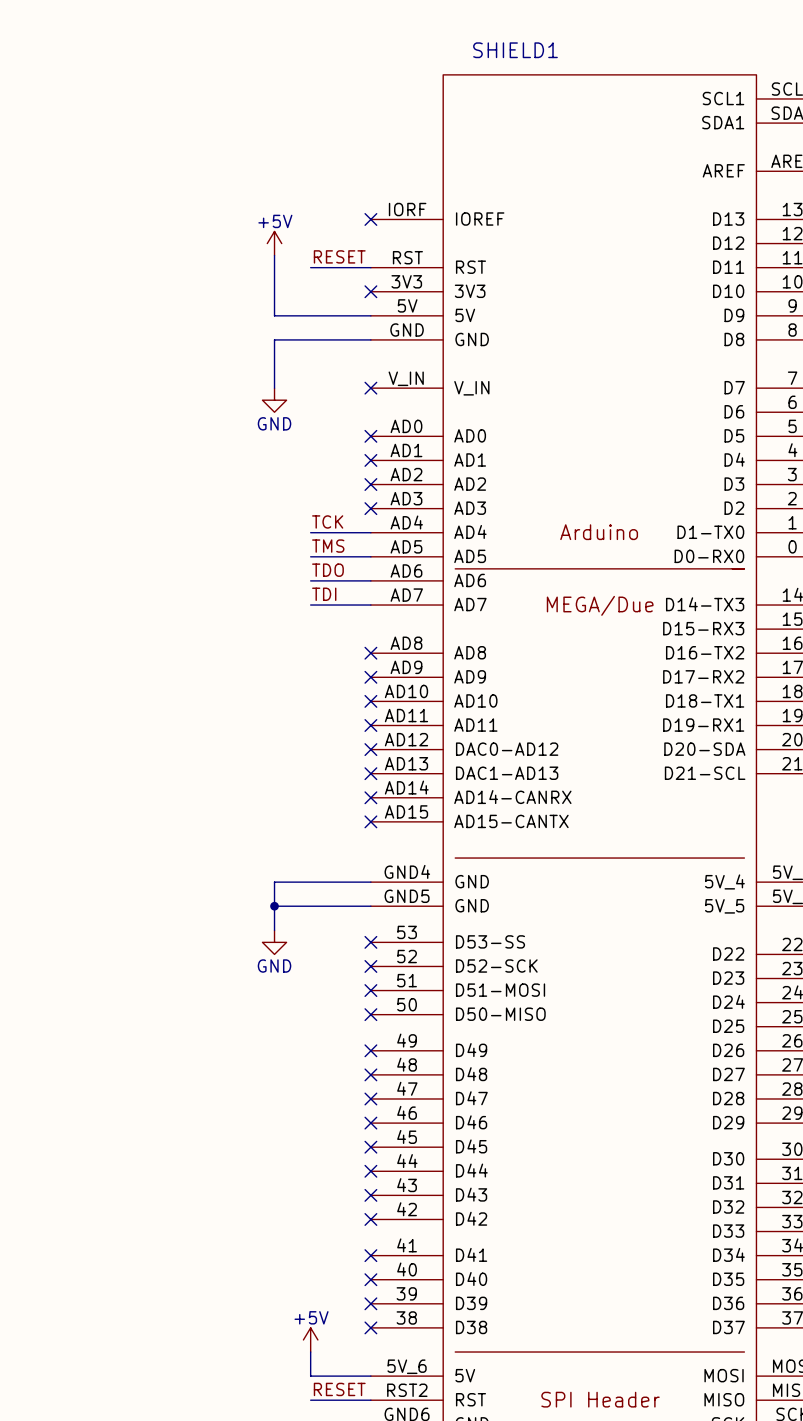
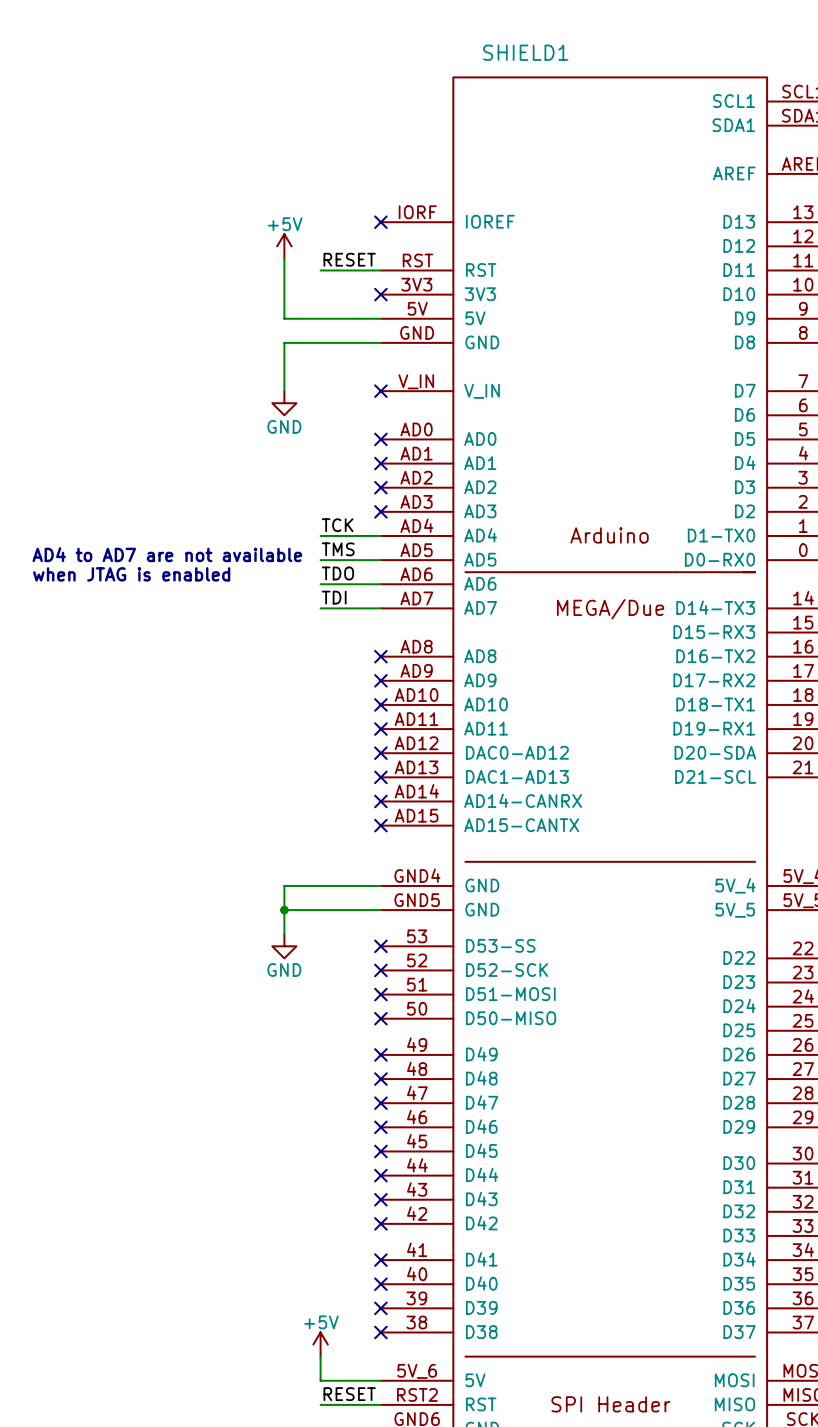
text: none -> AD4 to AD7 are not available (167, 554)
text: none -> when JTAG is enabled (131, 574)

